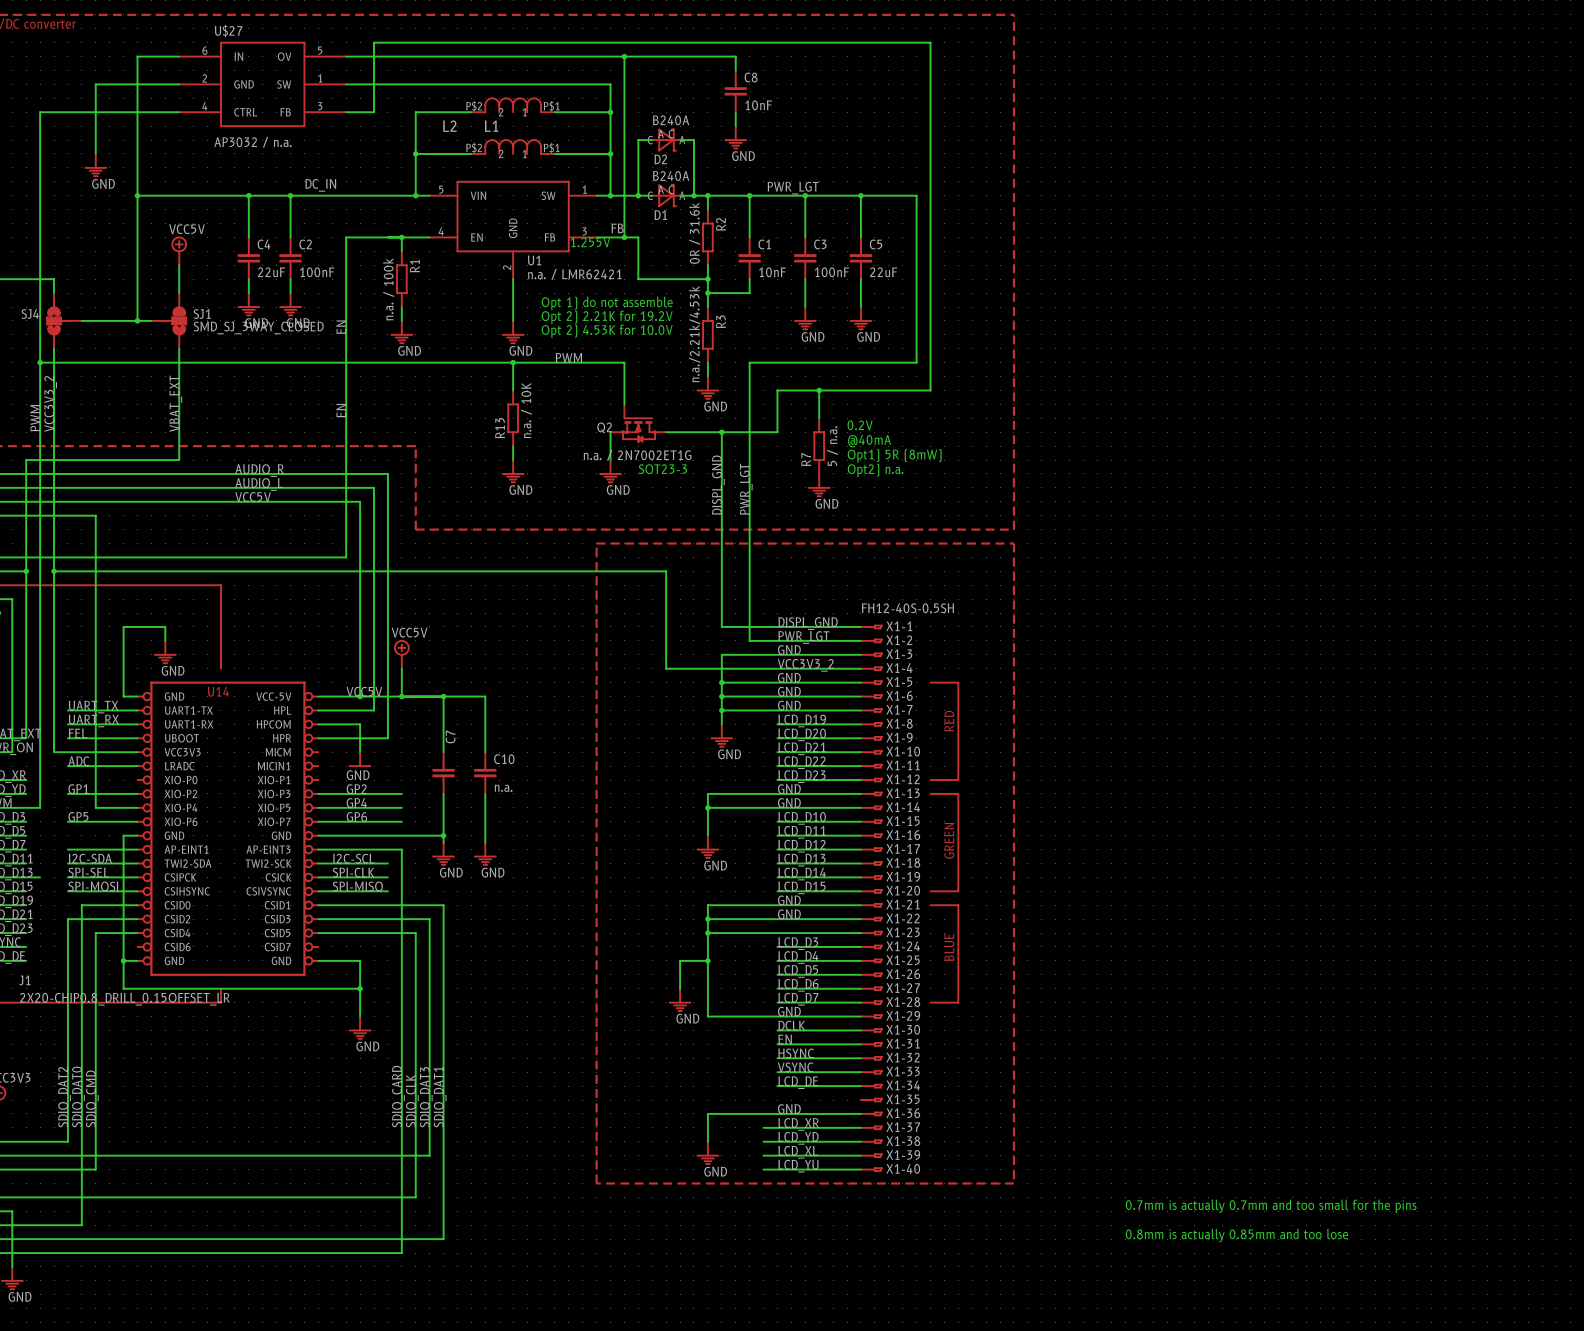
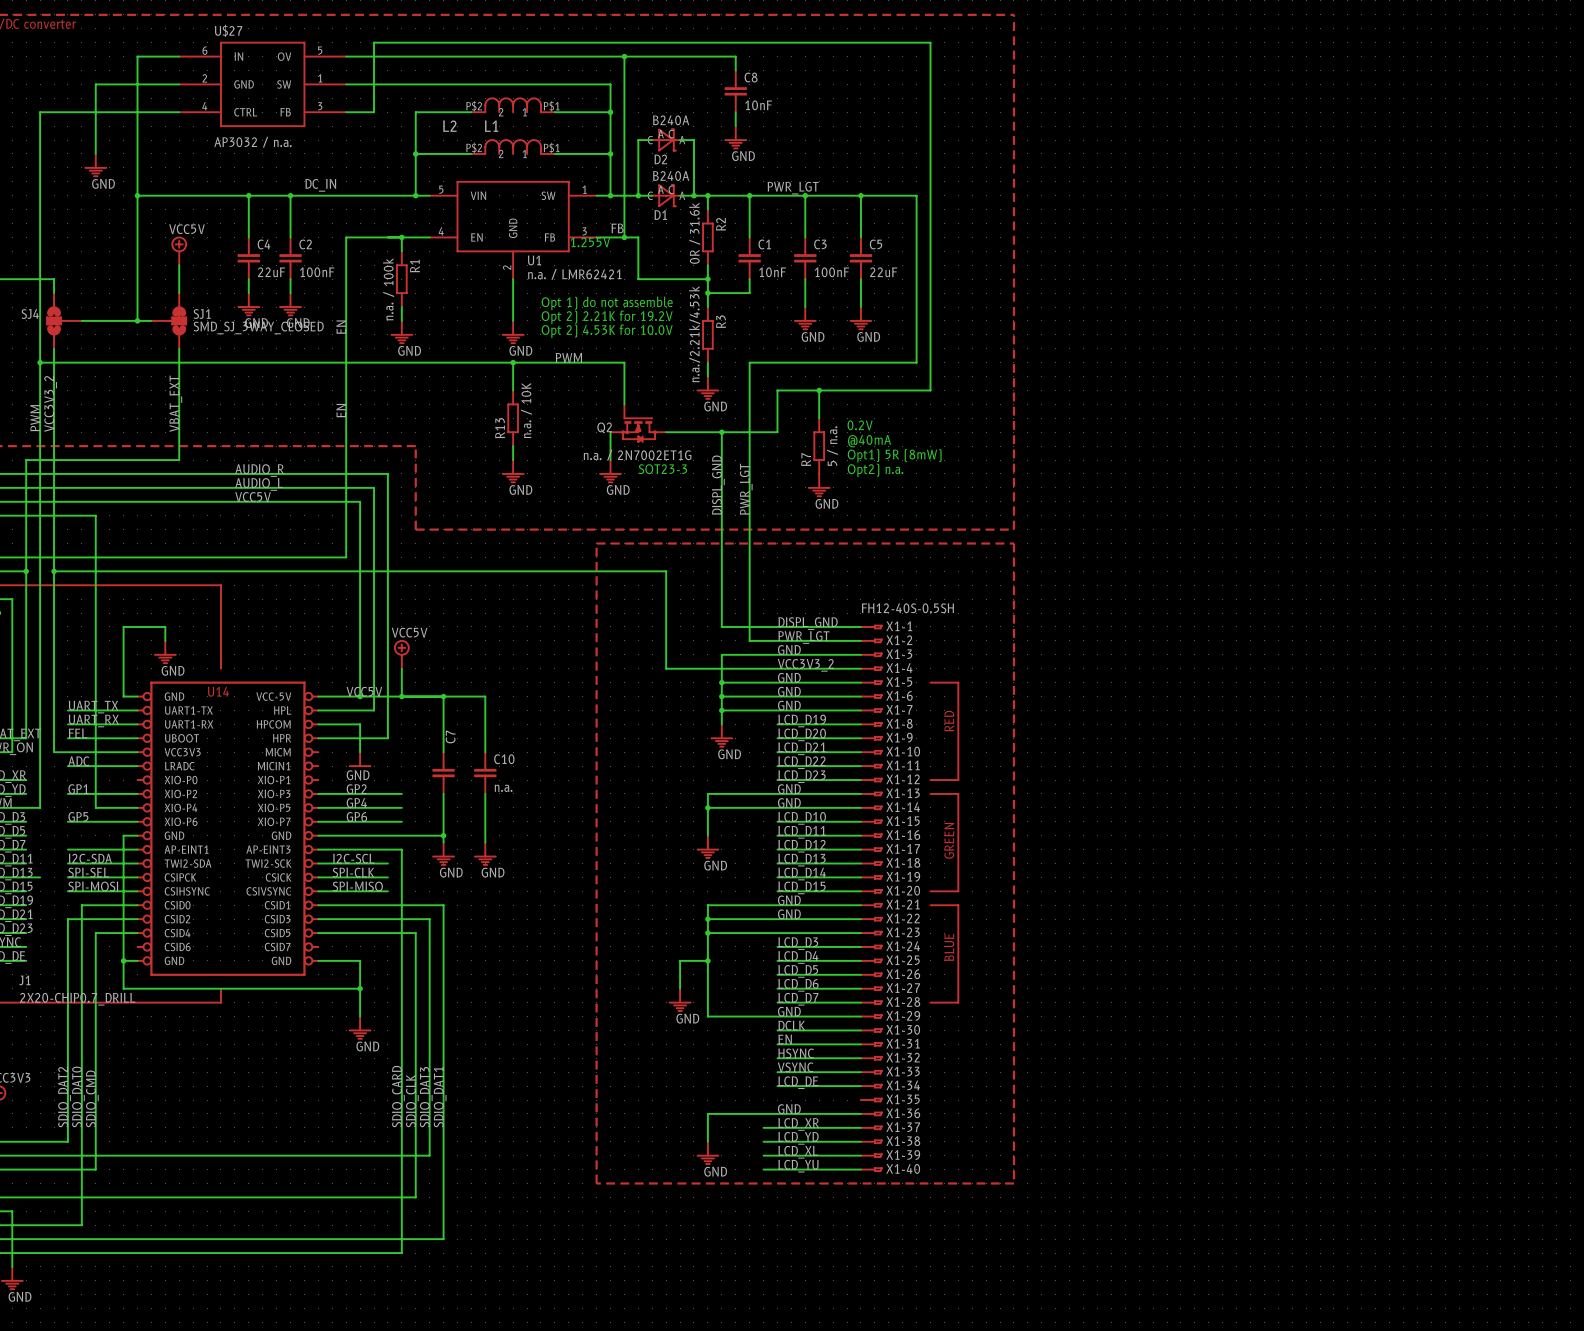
J1 value: 2X20-CHIP0.8_DRILL_0.15OFFSET_LR (125, 999) -> 2X20-CHIP0.7_DRILL (77, 999)
text: 0.7mm is actually 0.7mm and too small for the pins (1271, 1206) -> none
text: 0.8mm is actually 0.85mm and too lose (1236, 1235) -> none

